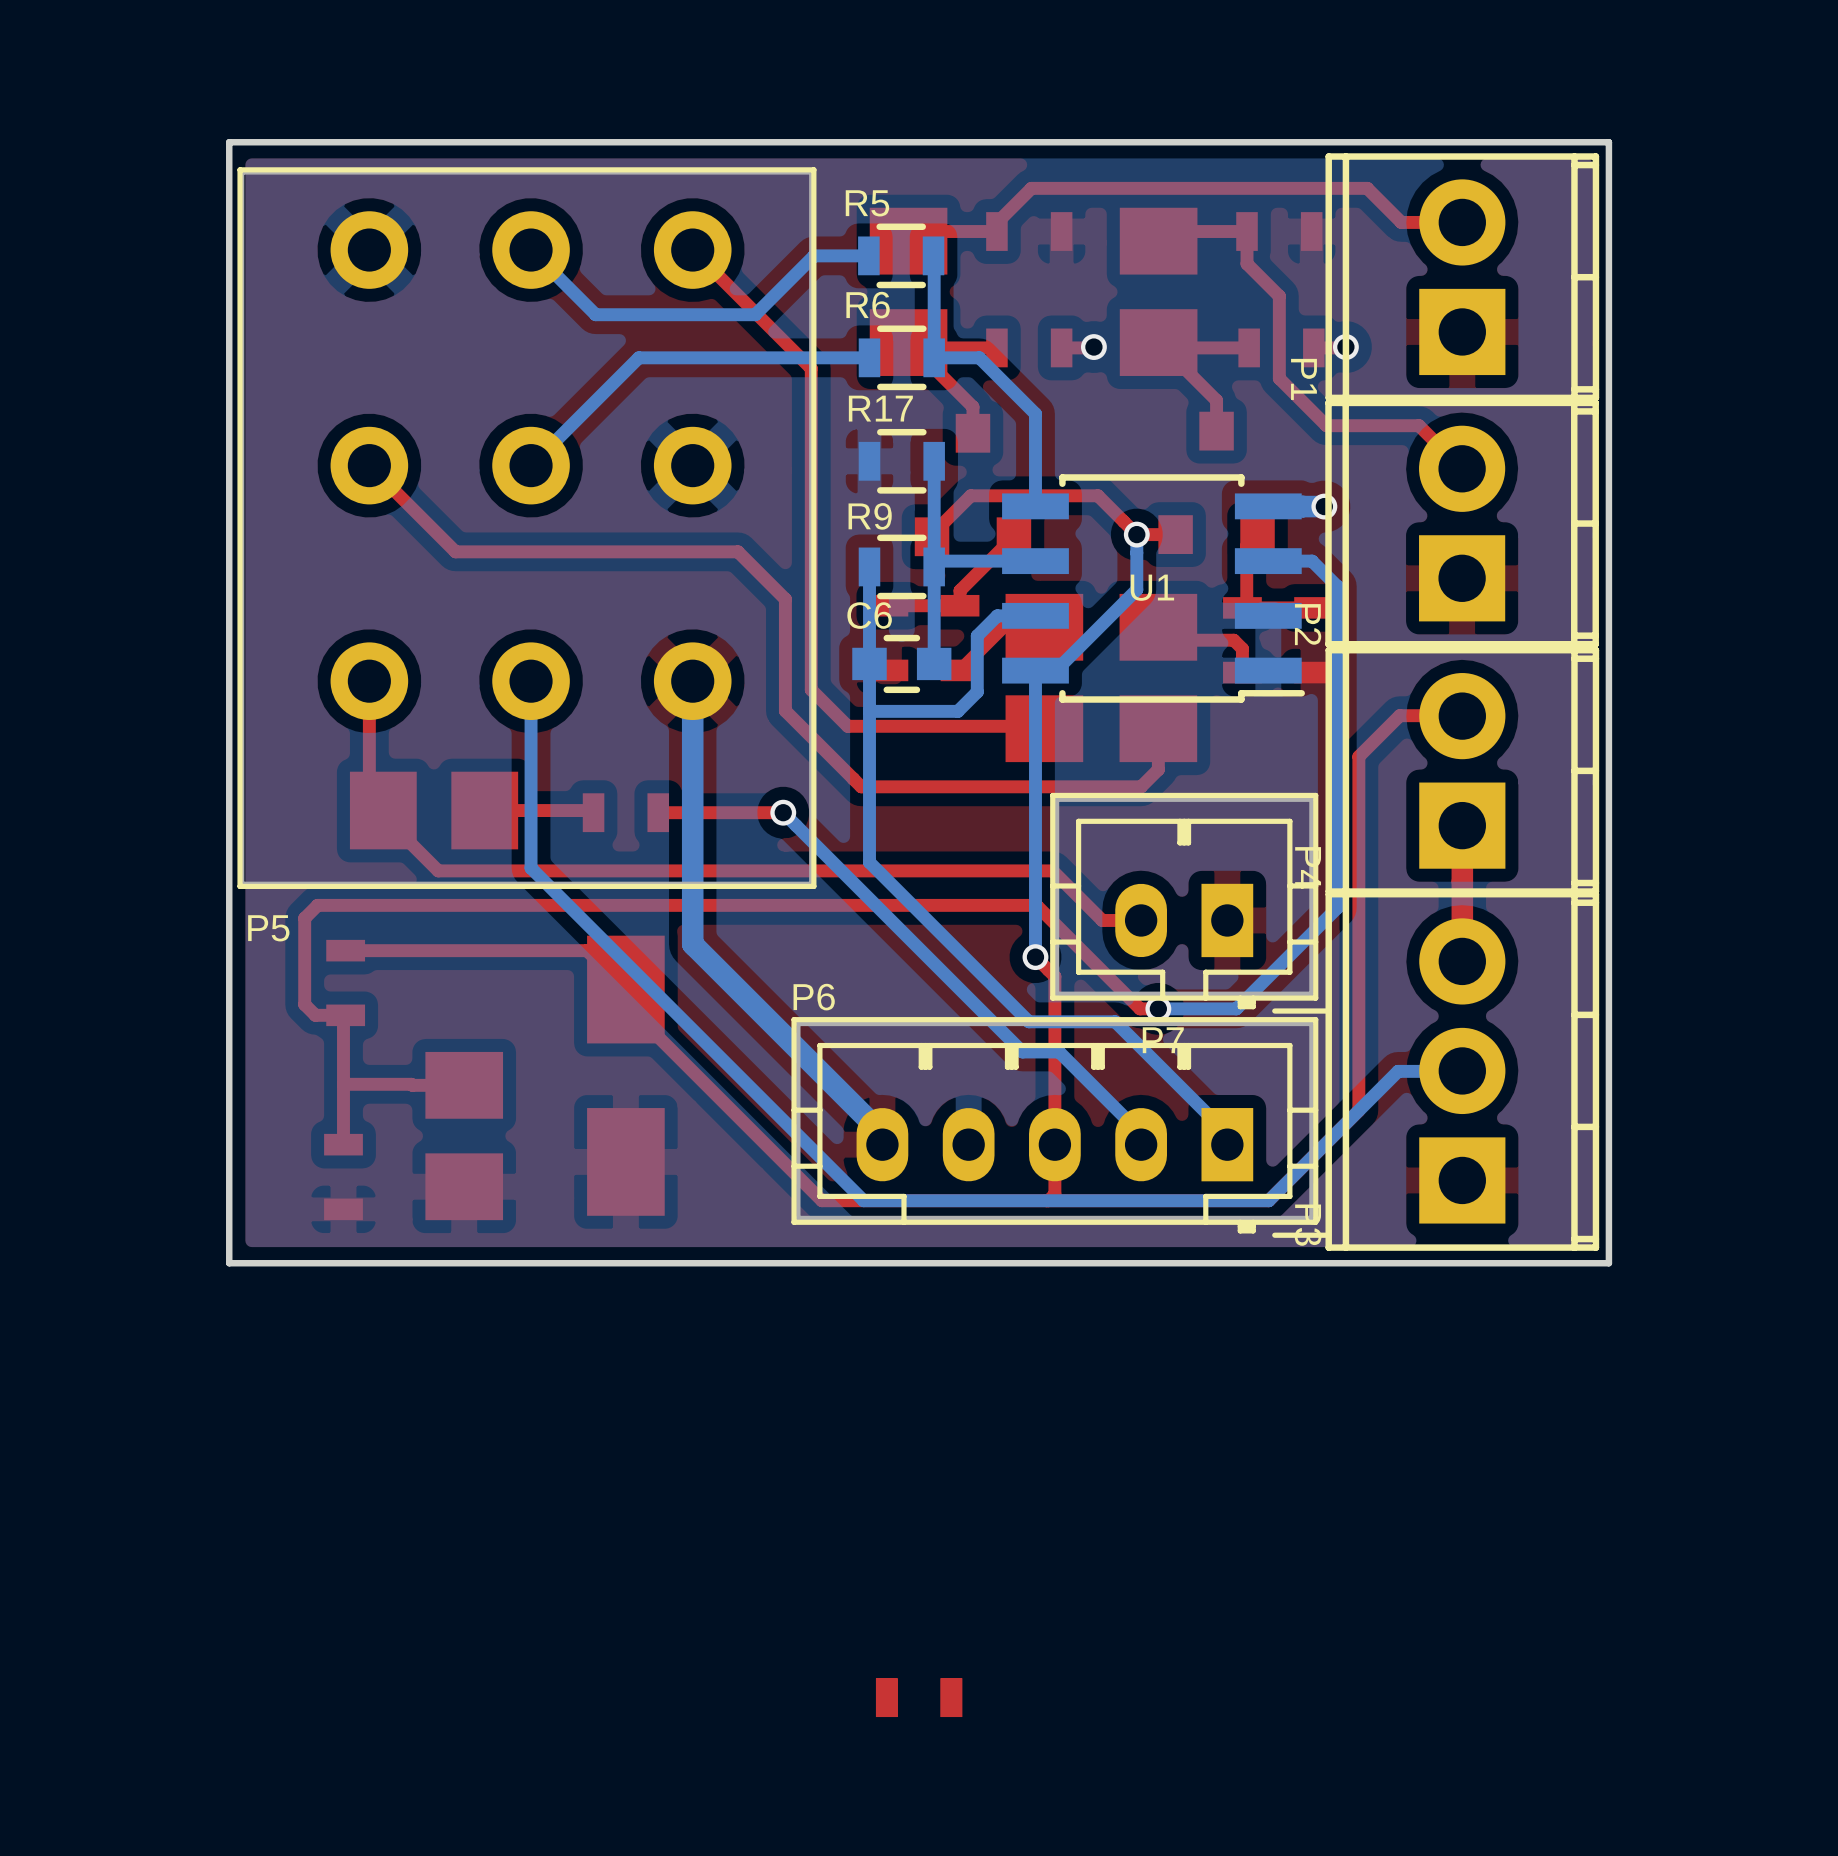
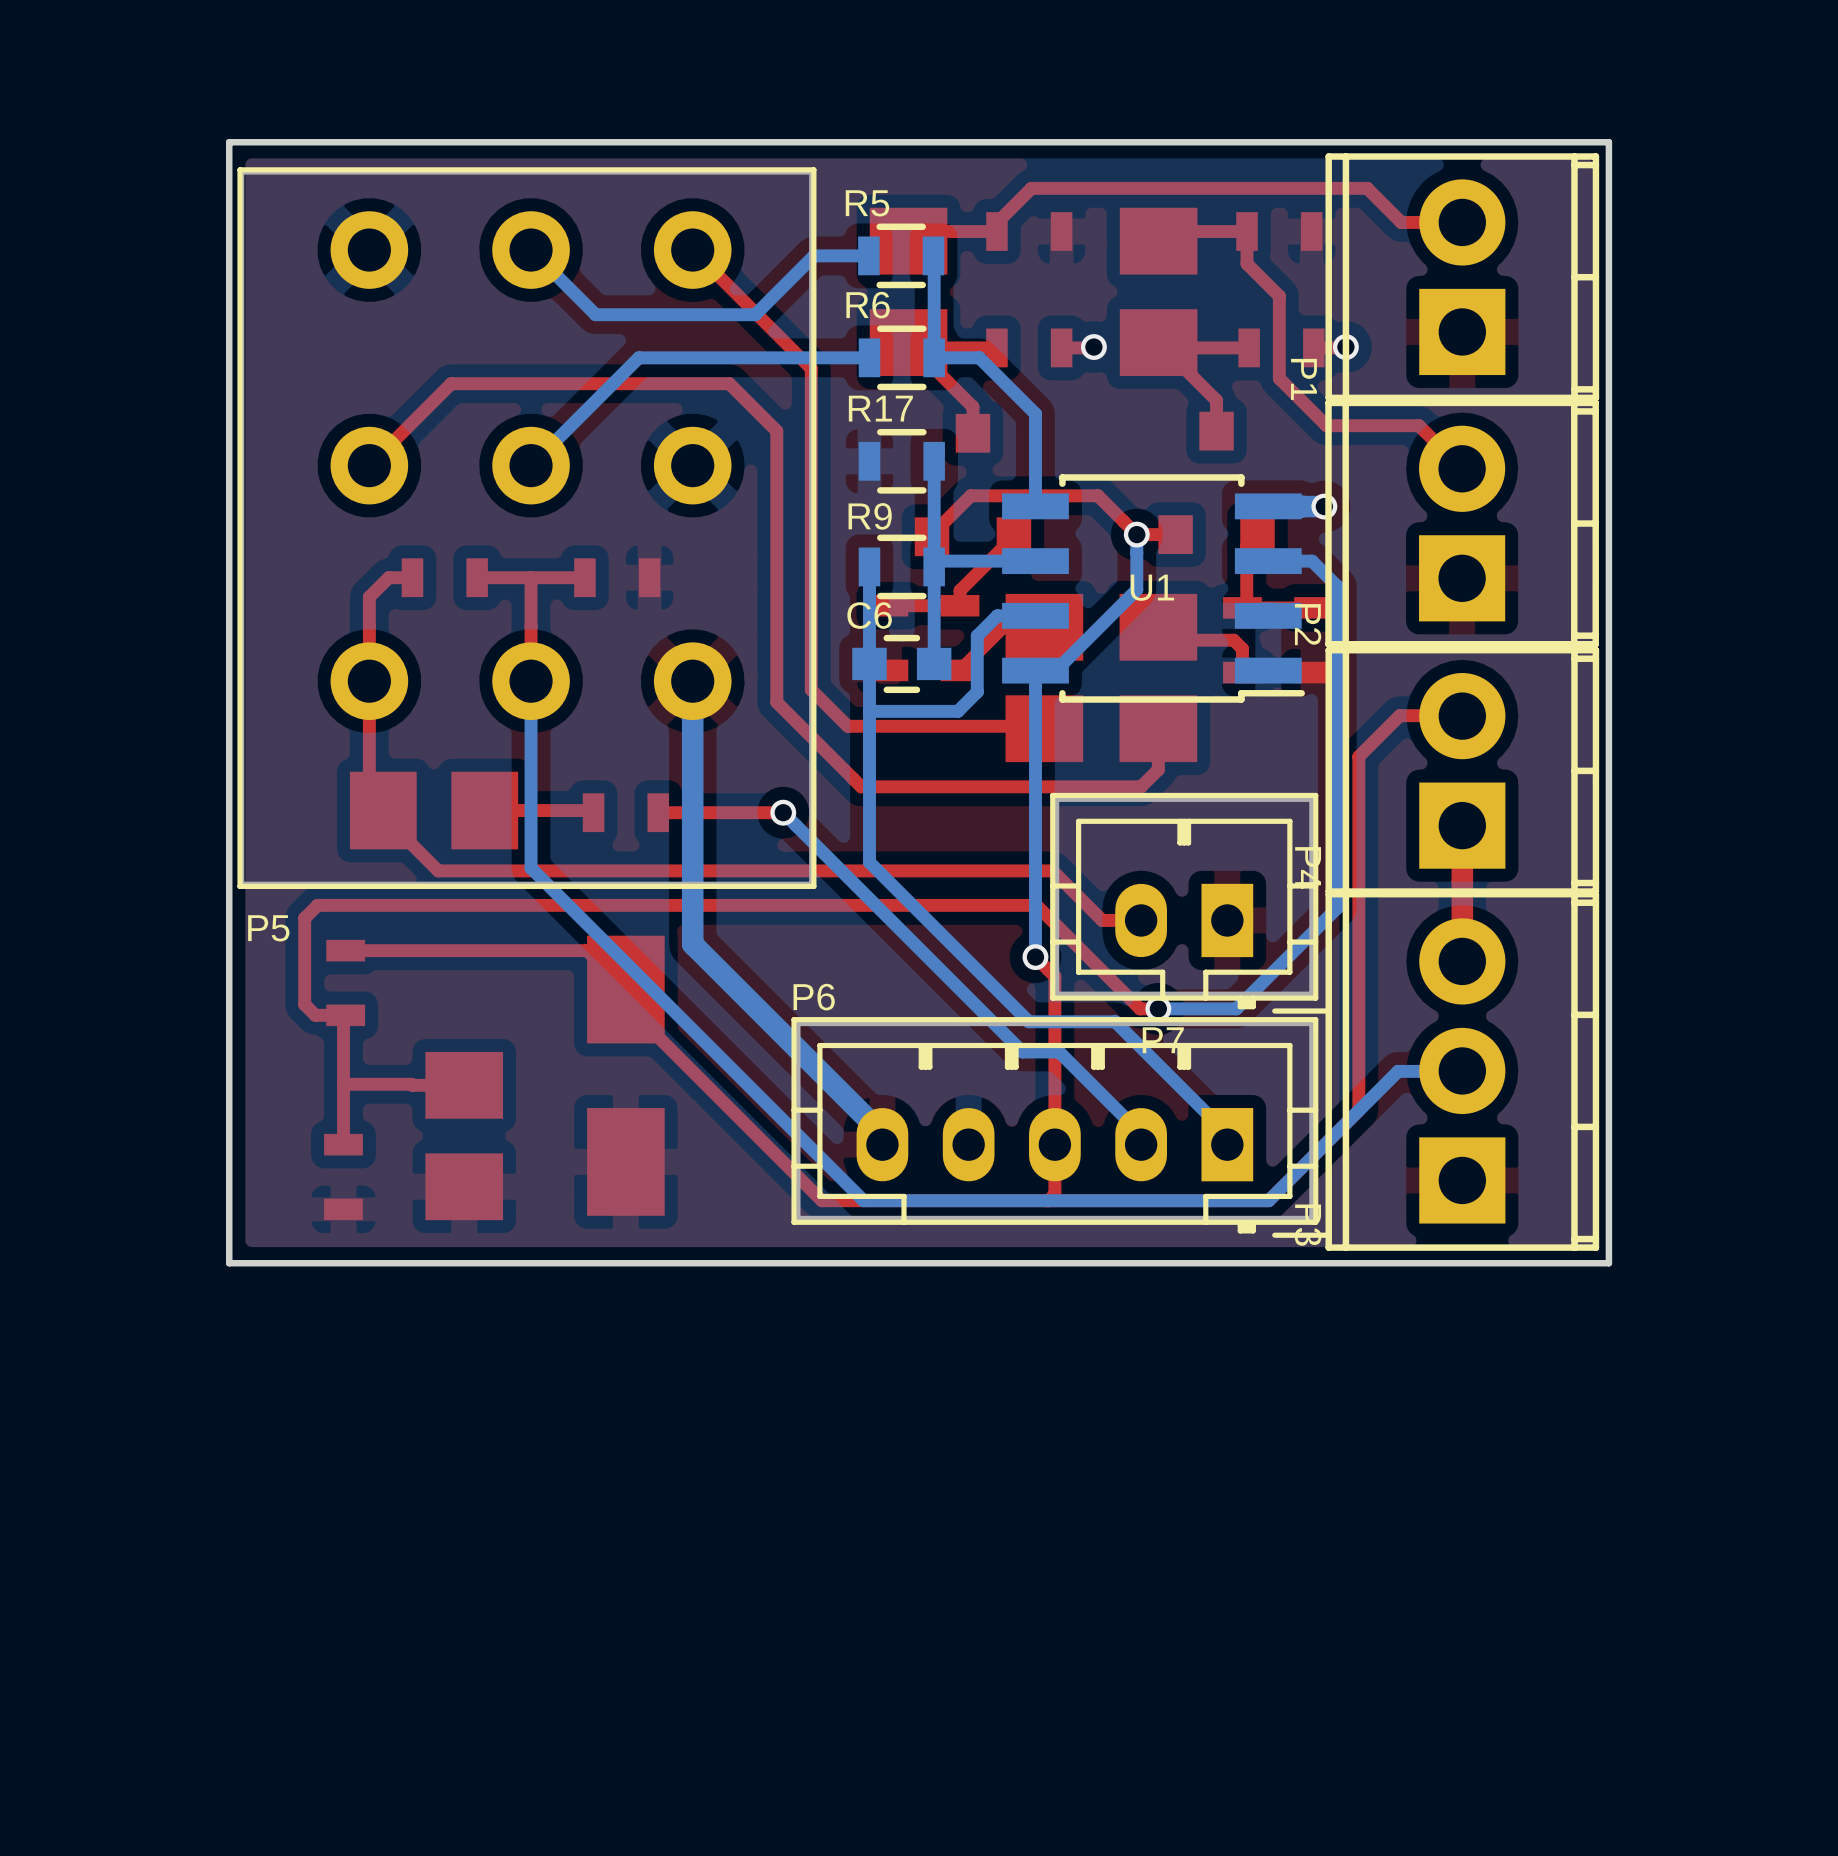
top track: (369, 465) (455, 551) (737, 551) (785, 599) (785, 710) -> (369, 465) (451, 383) (729, 383) (776, 431) (776, 702) (785, 710)
top track: none -> (412, 577) (388, 577) (369, 597) (369, 681)
part: none -> (444, 577)
top track: none -> (531, 577) (531, 681)
top track: none -> (584, 577) (477, 577)
part: none -> (617, 577)
part: (919, 1697) -> none

